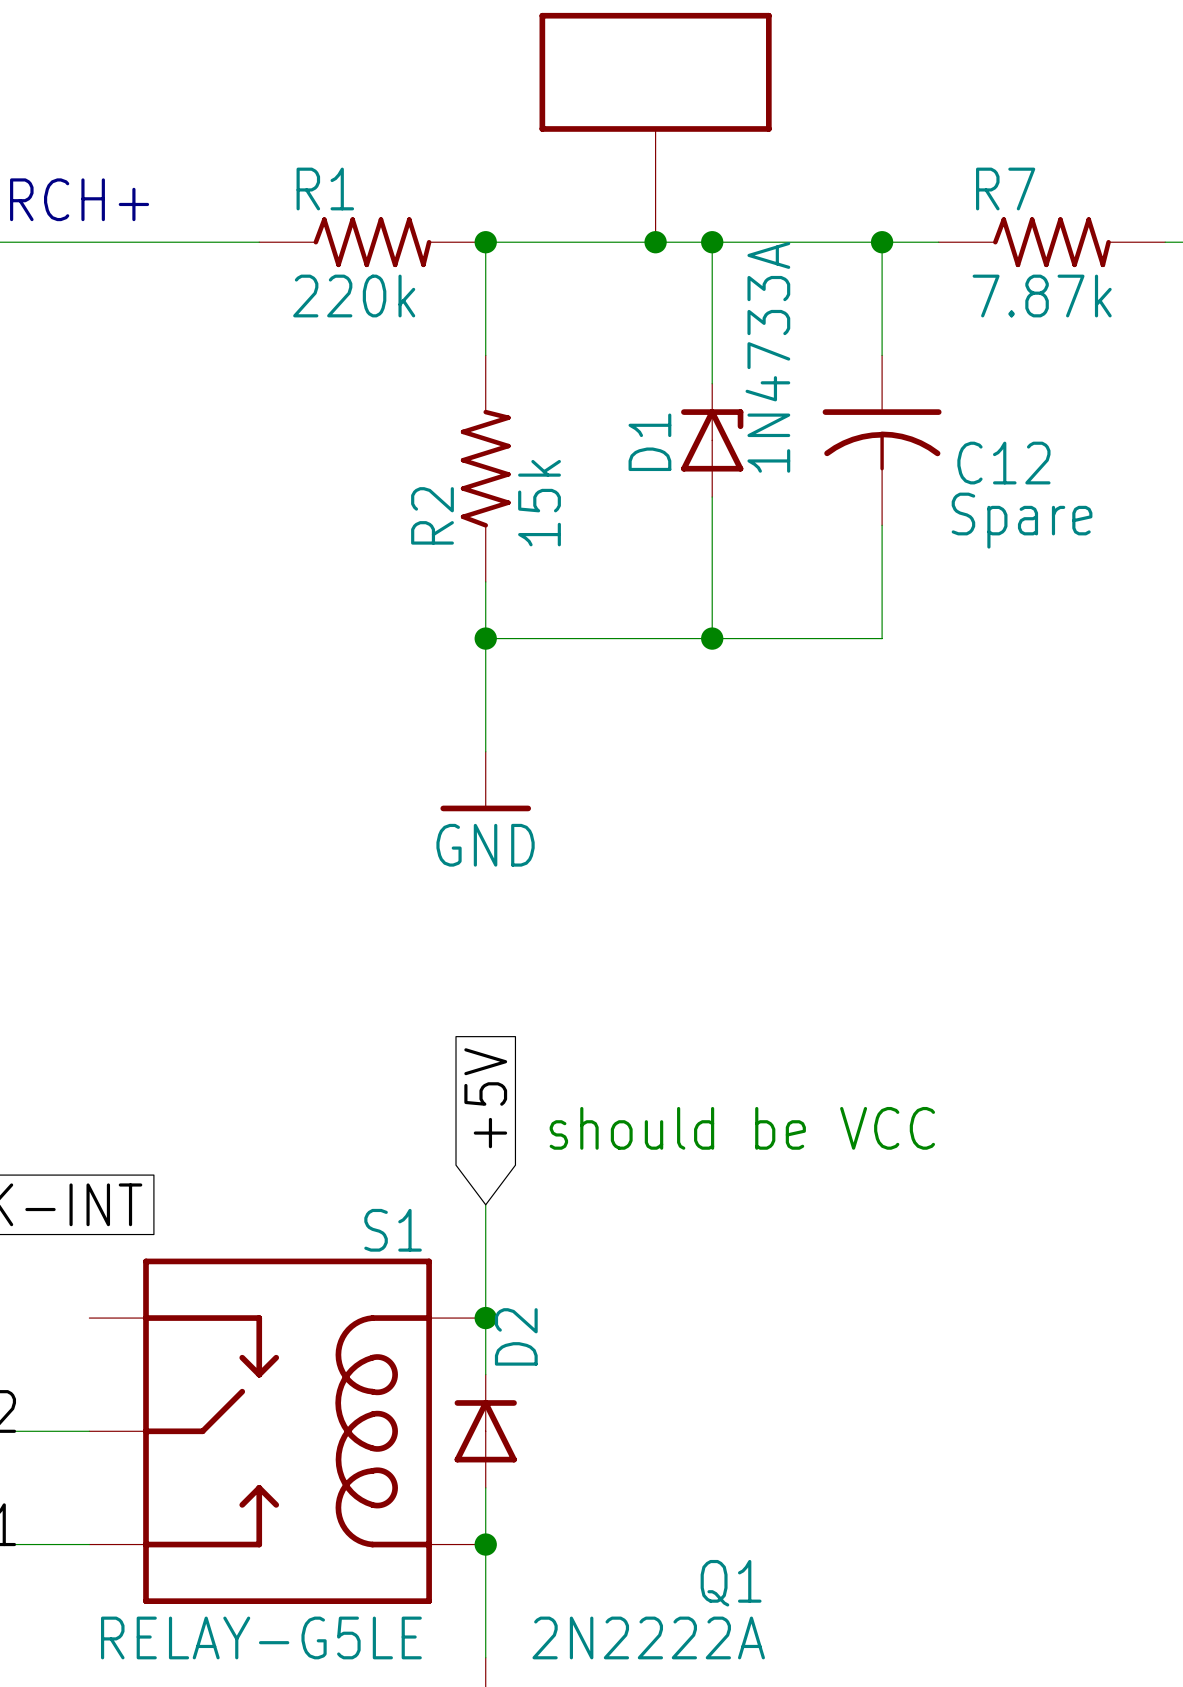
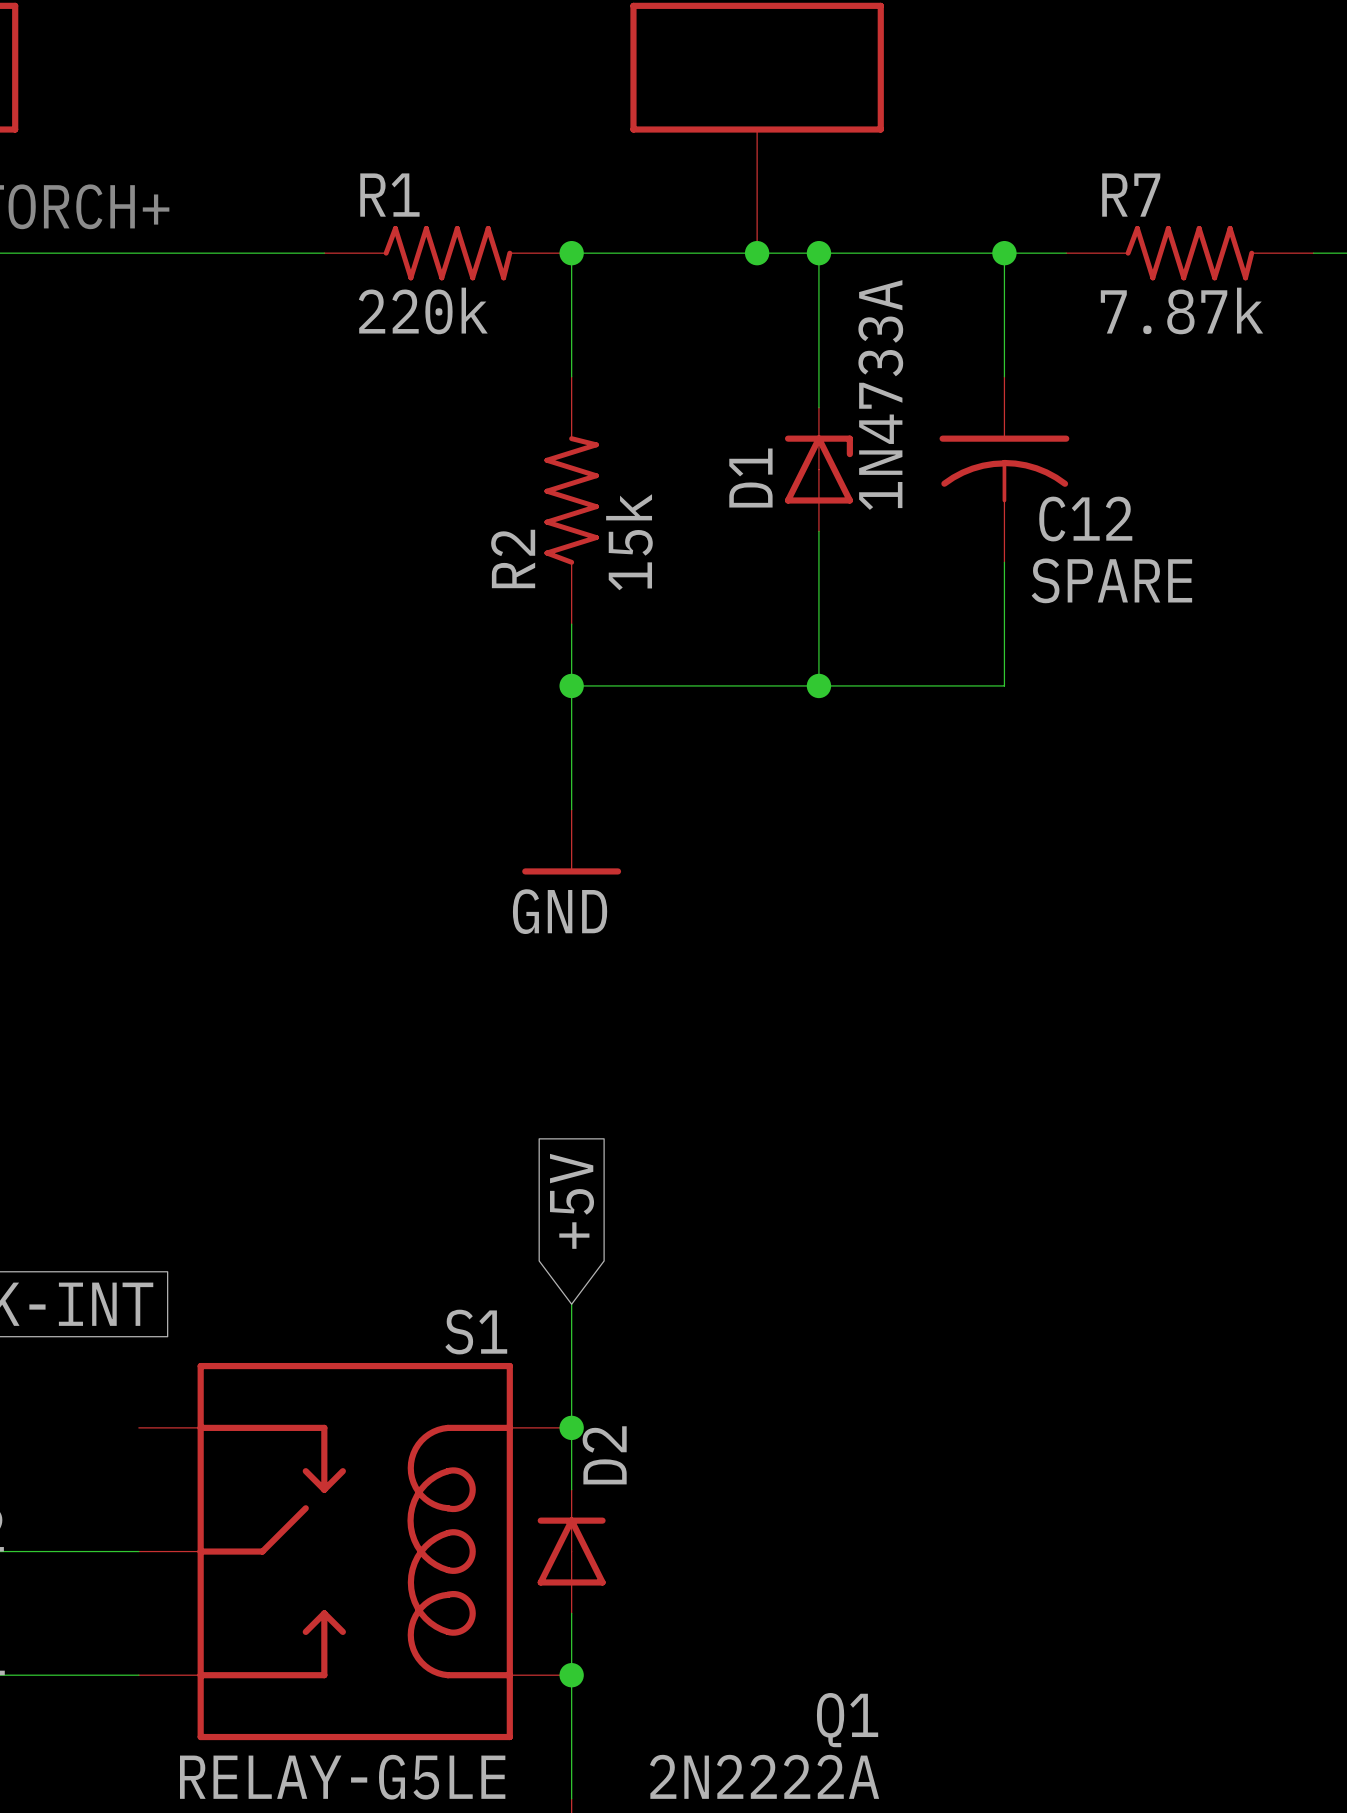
C12 name position: C12 (1003, 463) -> C12 (1085, 519)
C12 value: Spare (1022, 520) -> SPARE (1111, 580)
text: should be VCC (742, 1128) -> none

